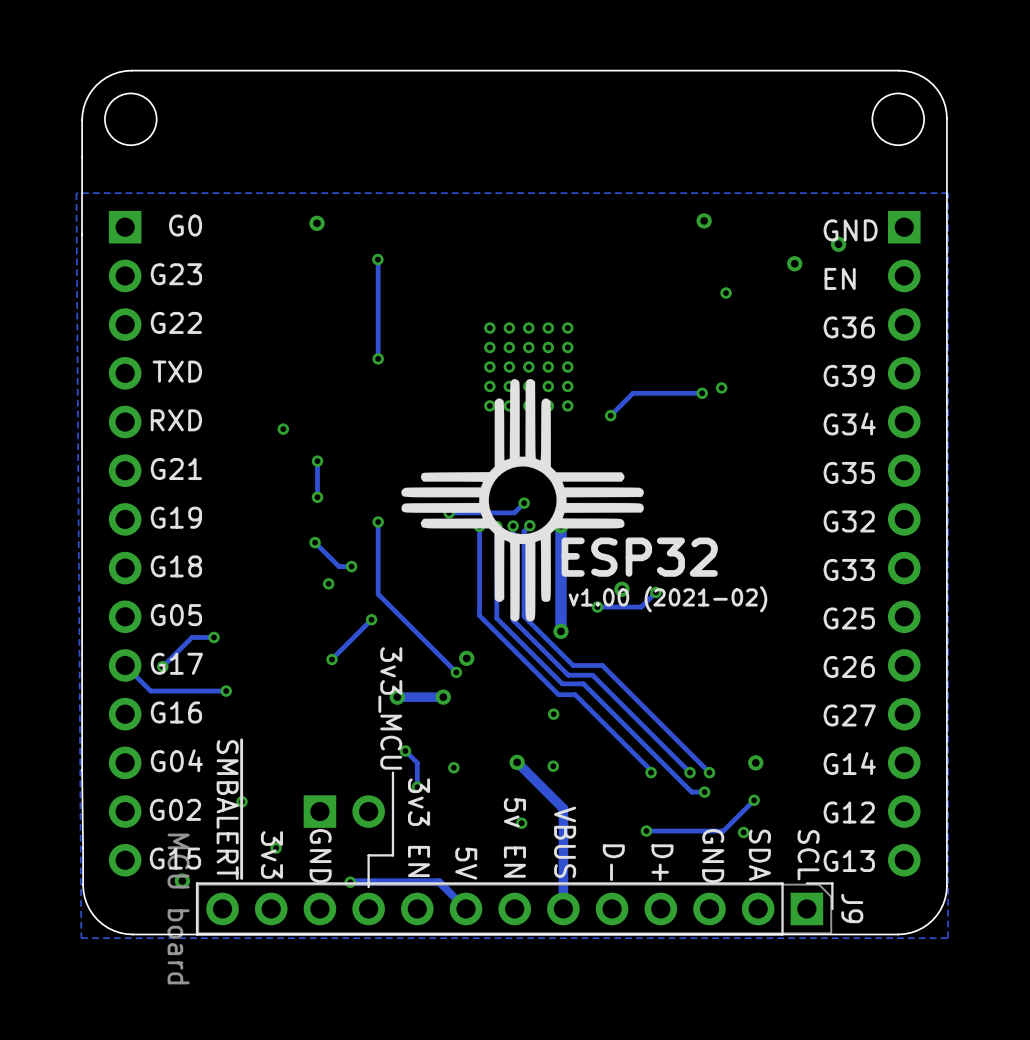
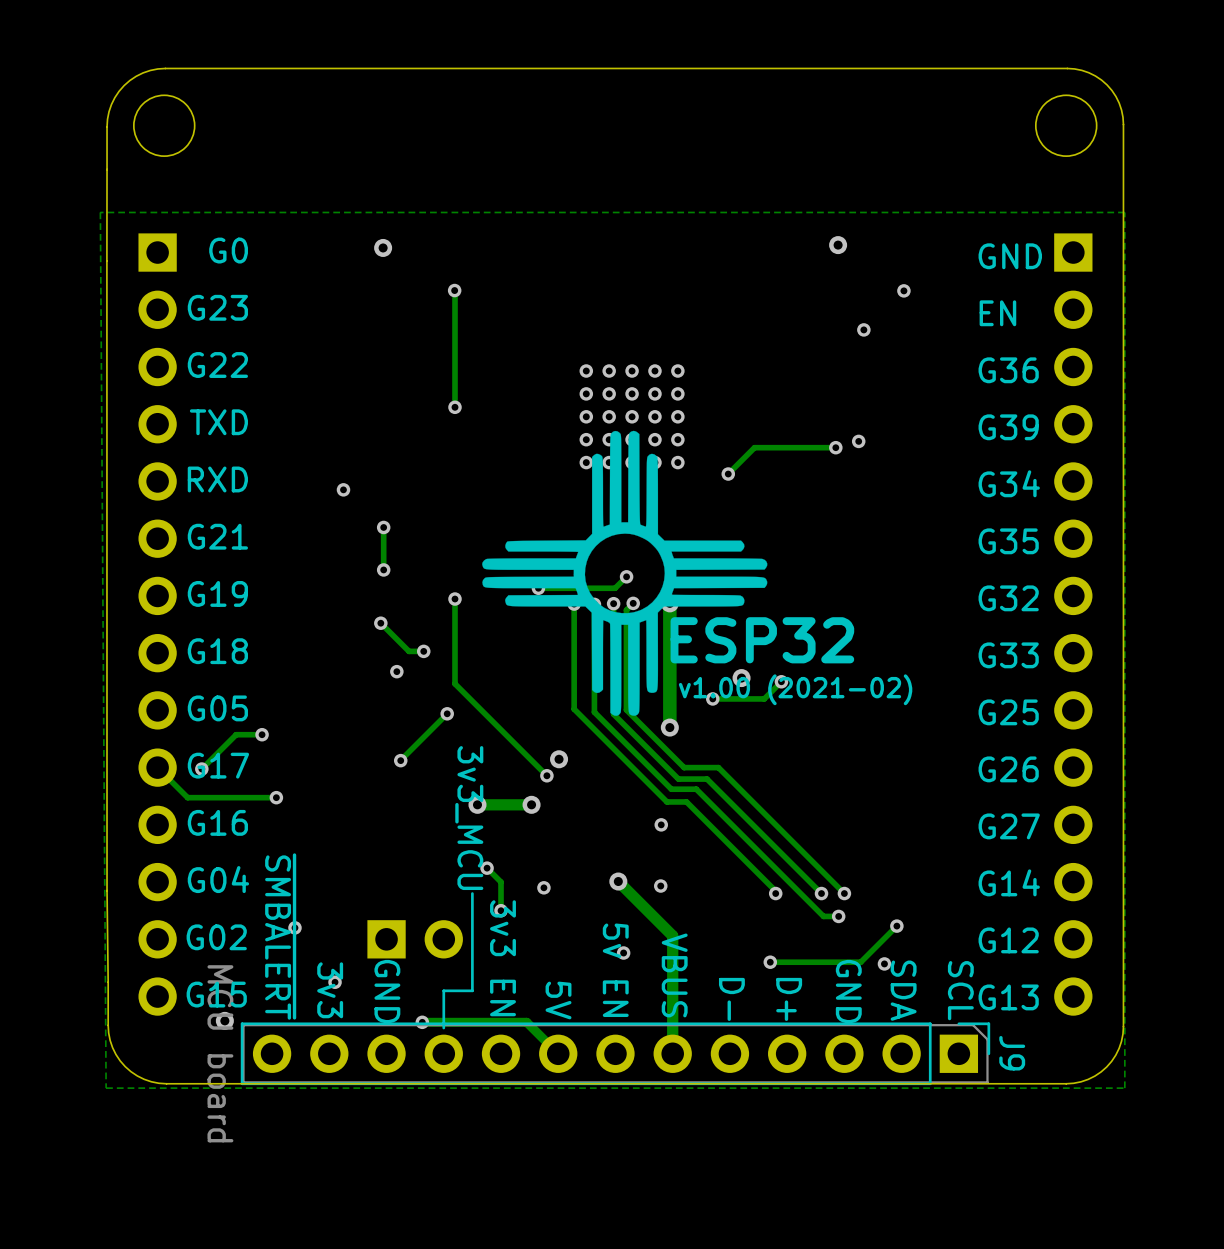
via: (838, 244) -> none
via: none -> (903, 290)
via: (794, 263) -> none
via: (755, 762) -> none

